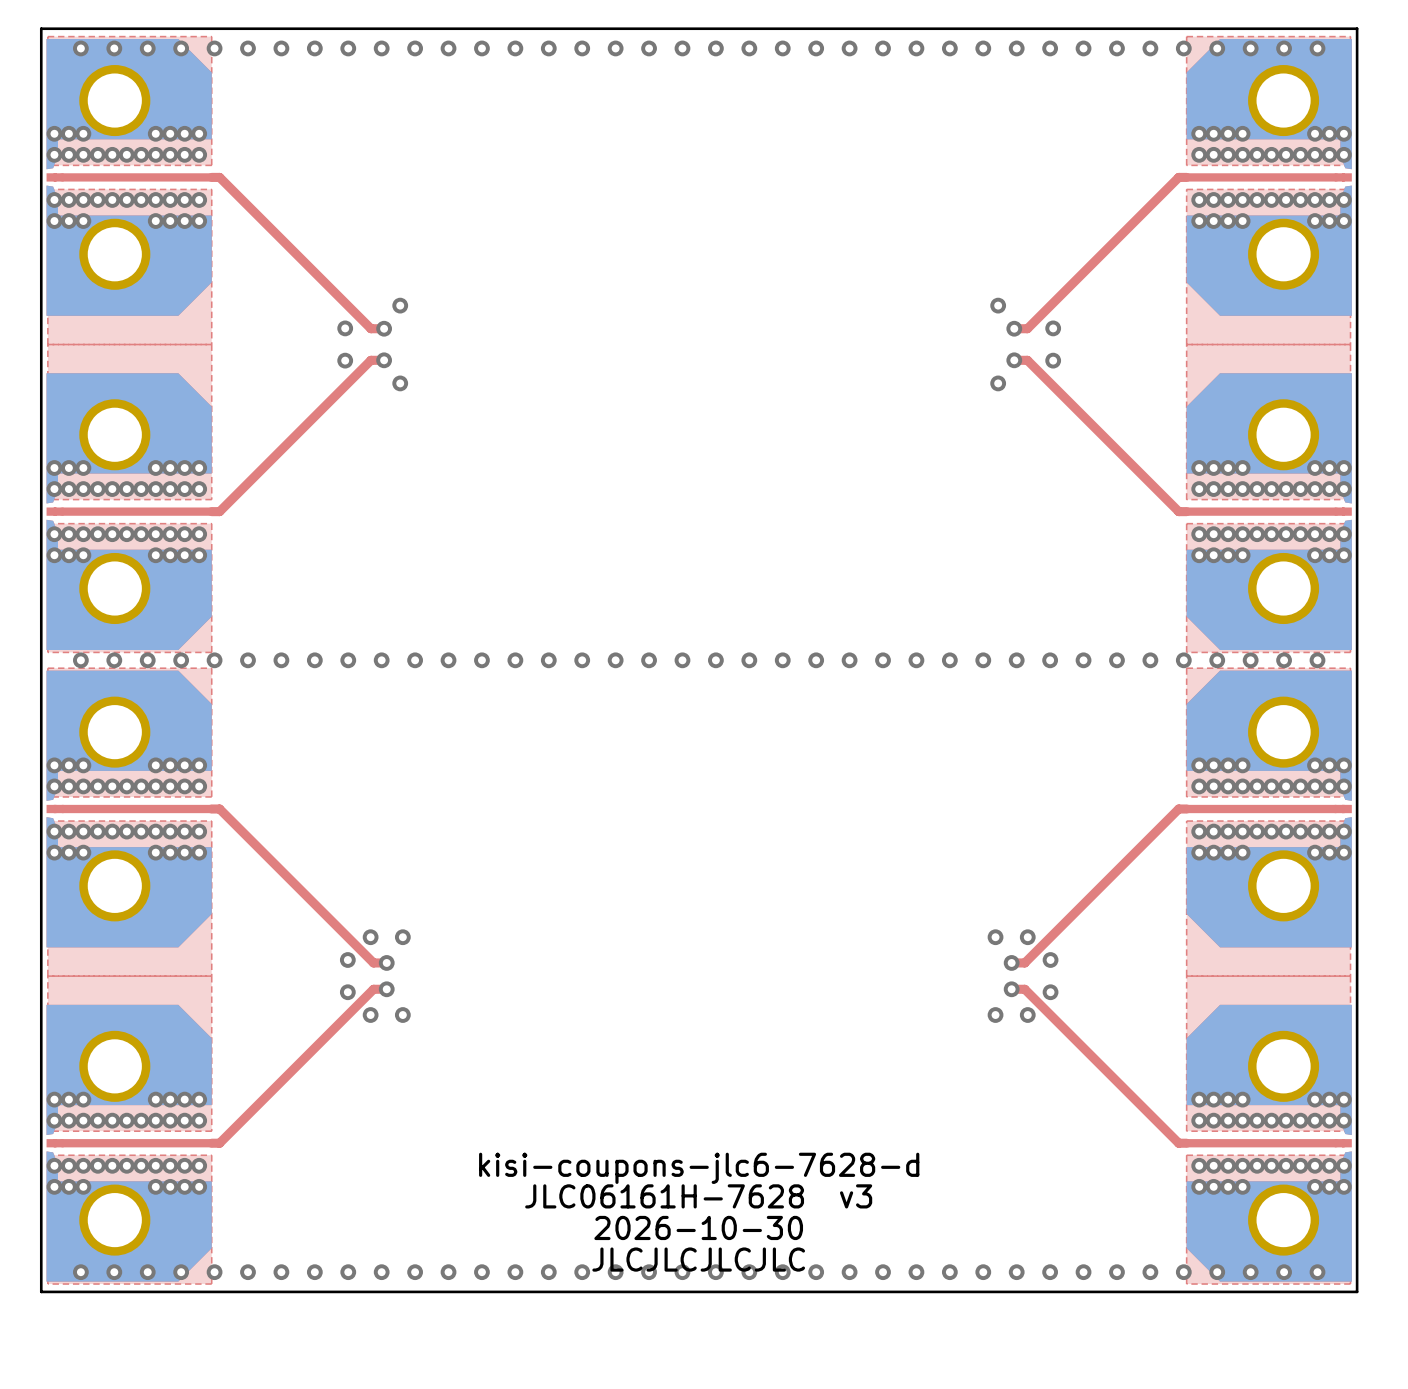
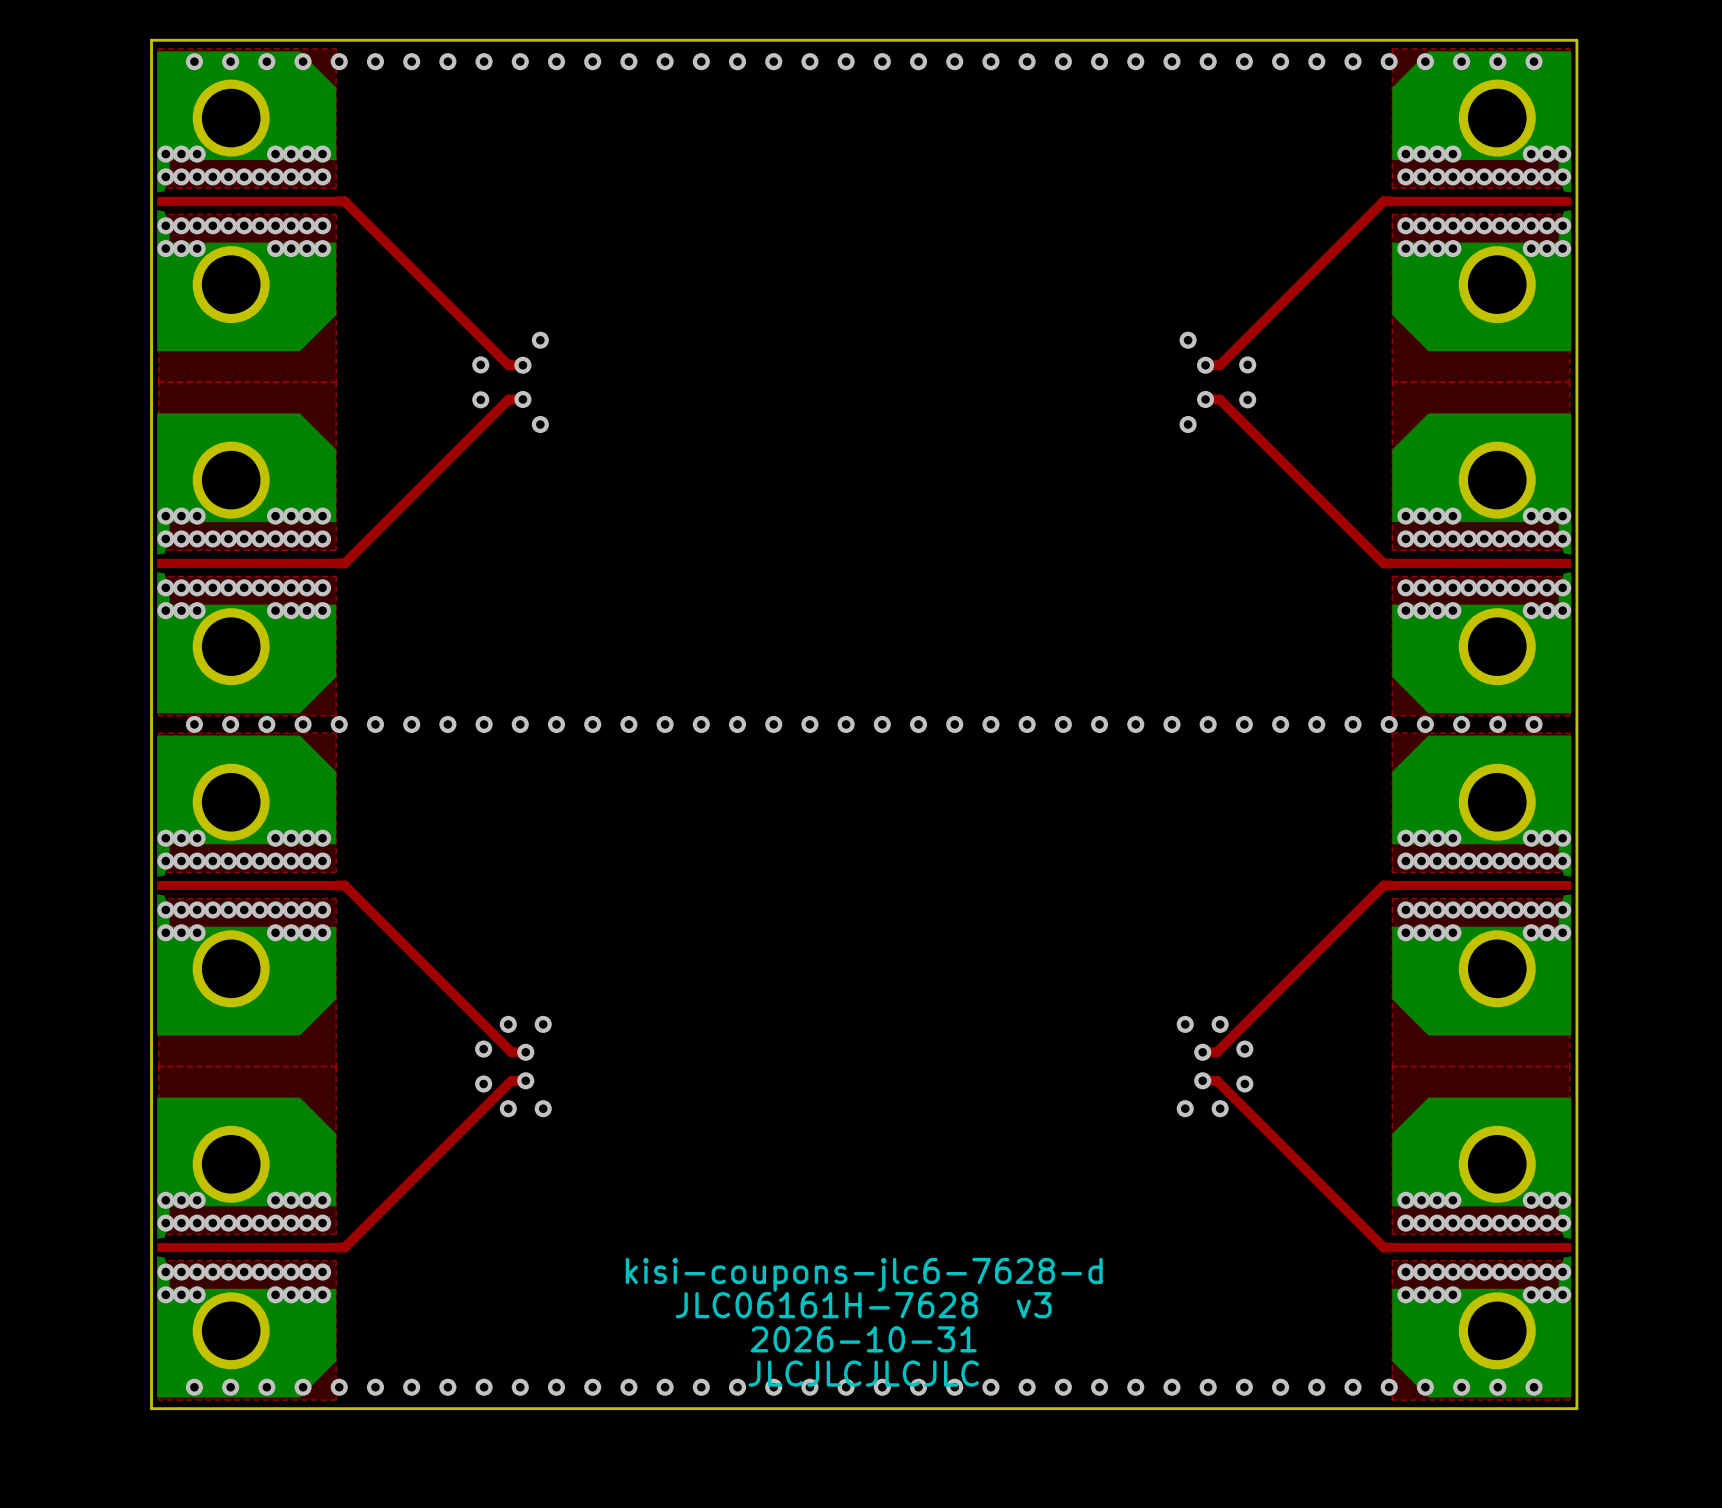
text: 2026-10-30 (698, 1227) -> 2026-10-31 (863, 1339)

